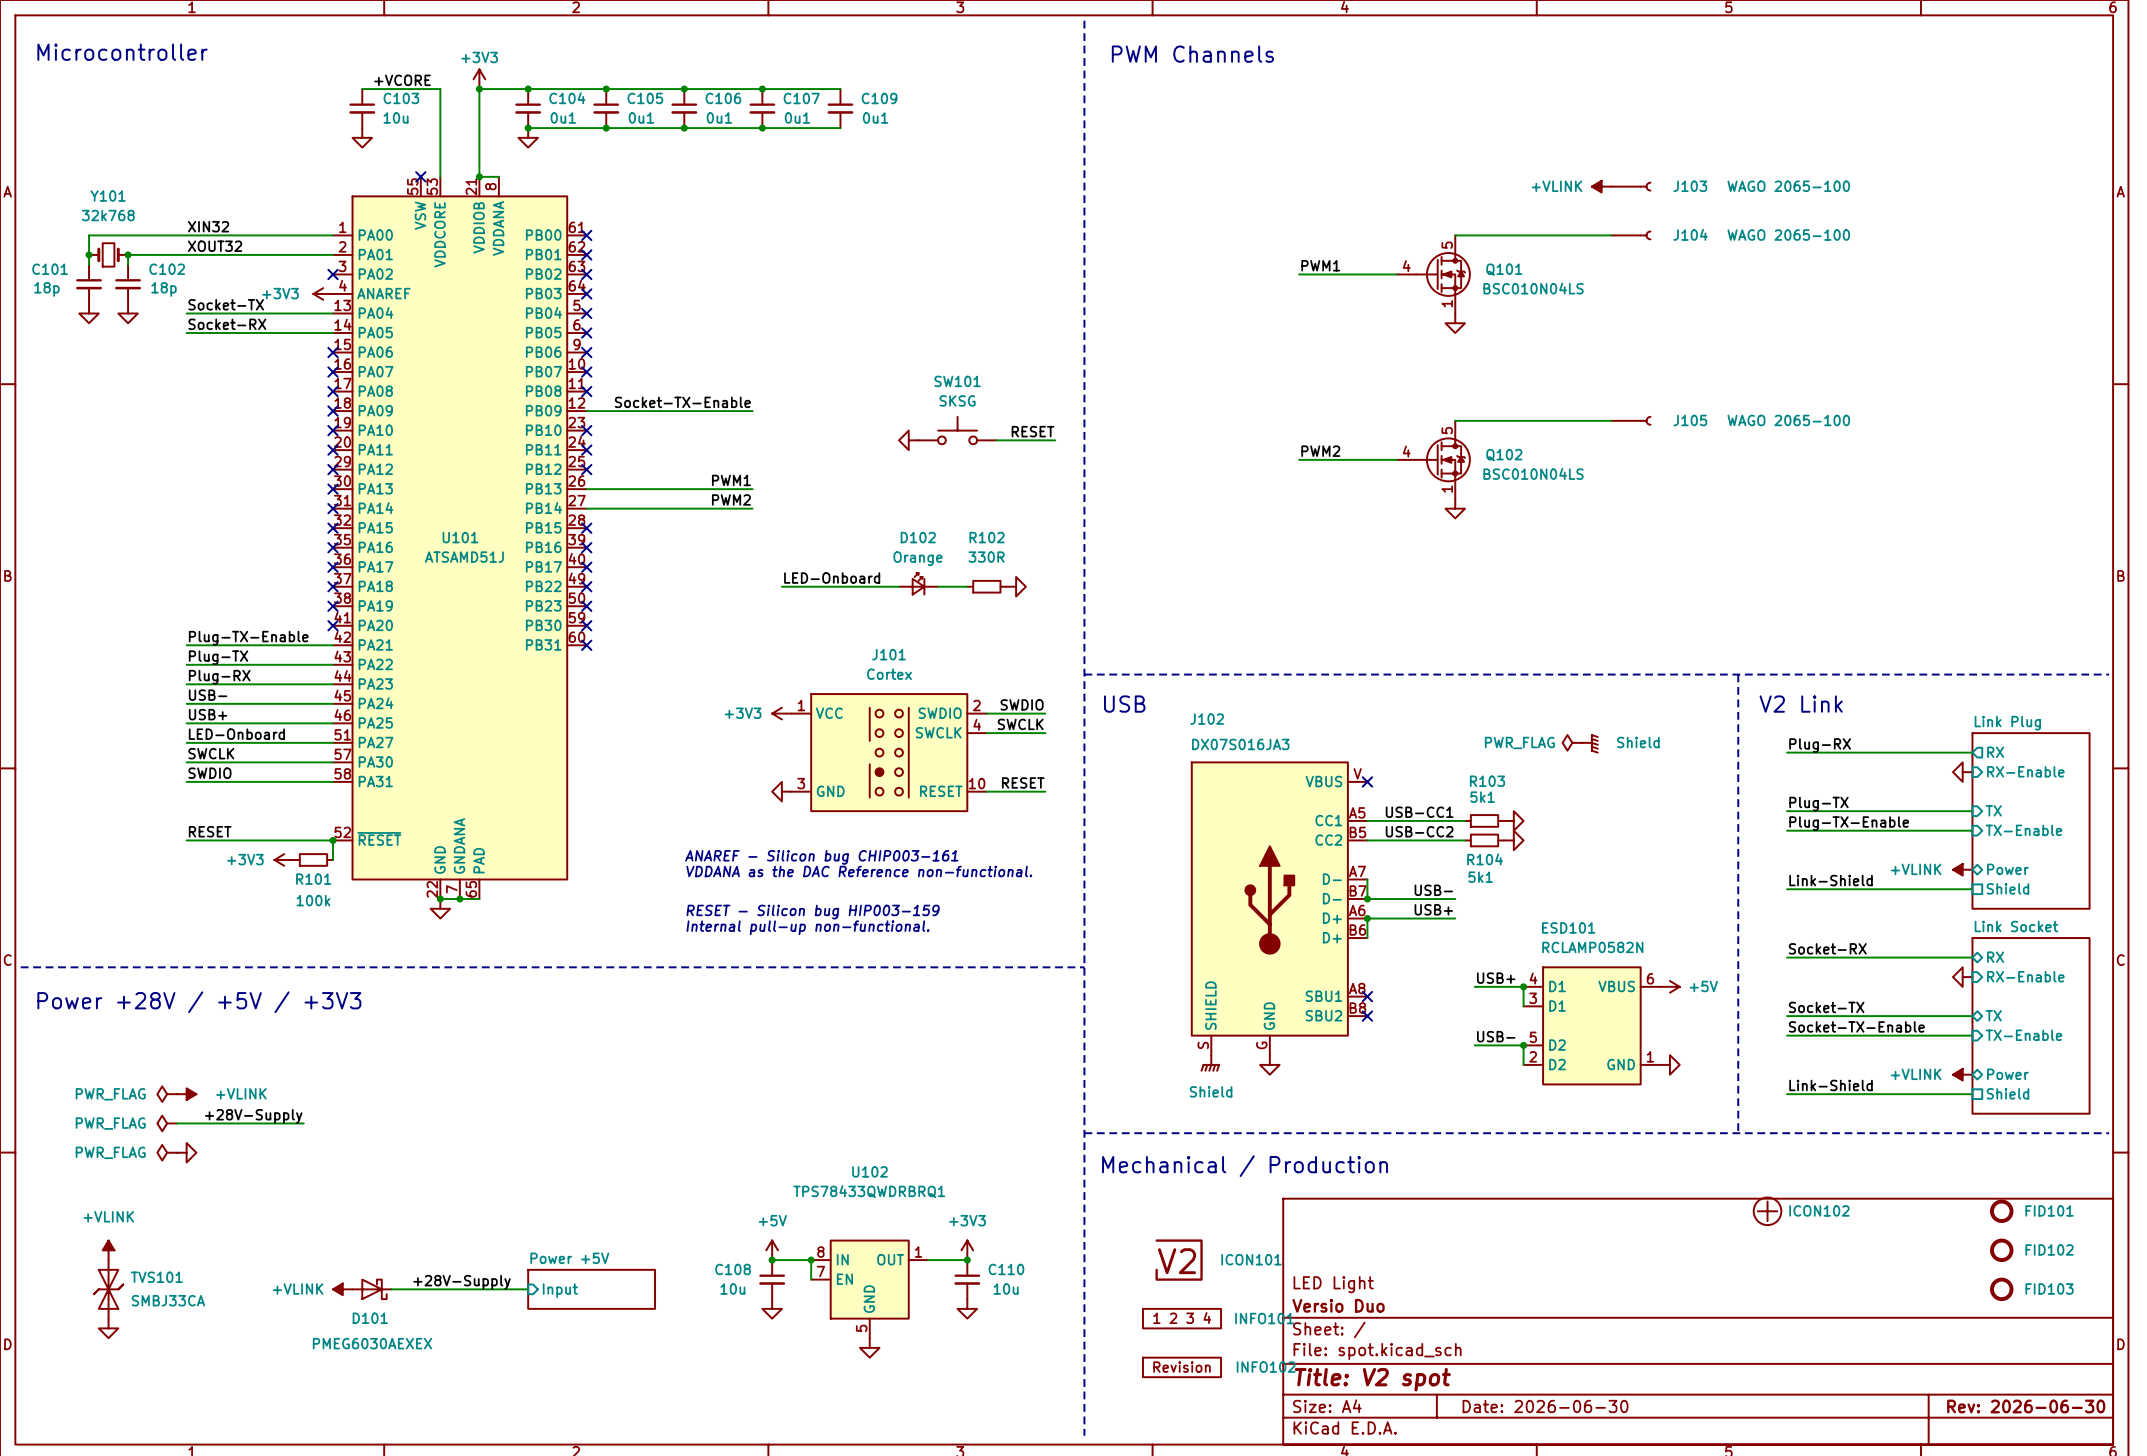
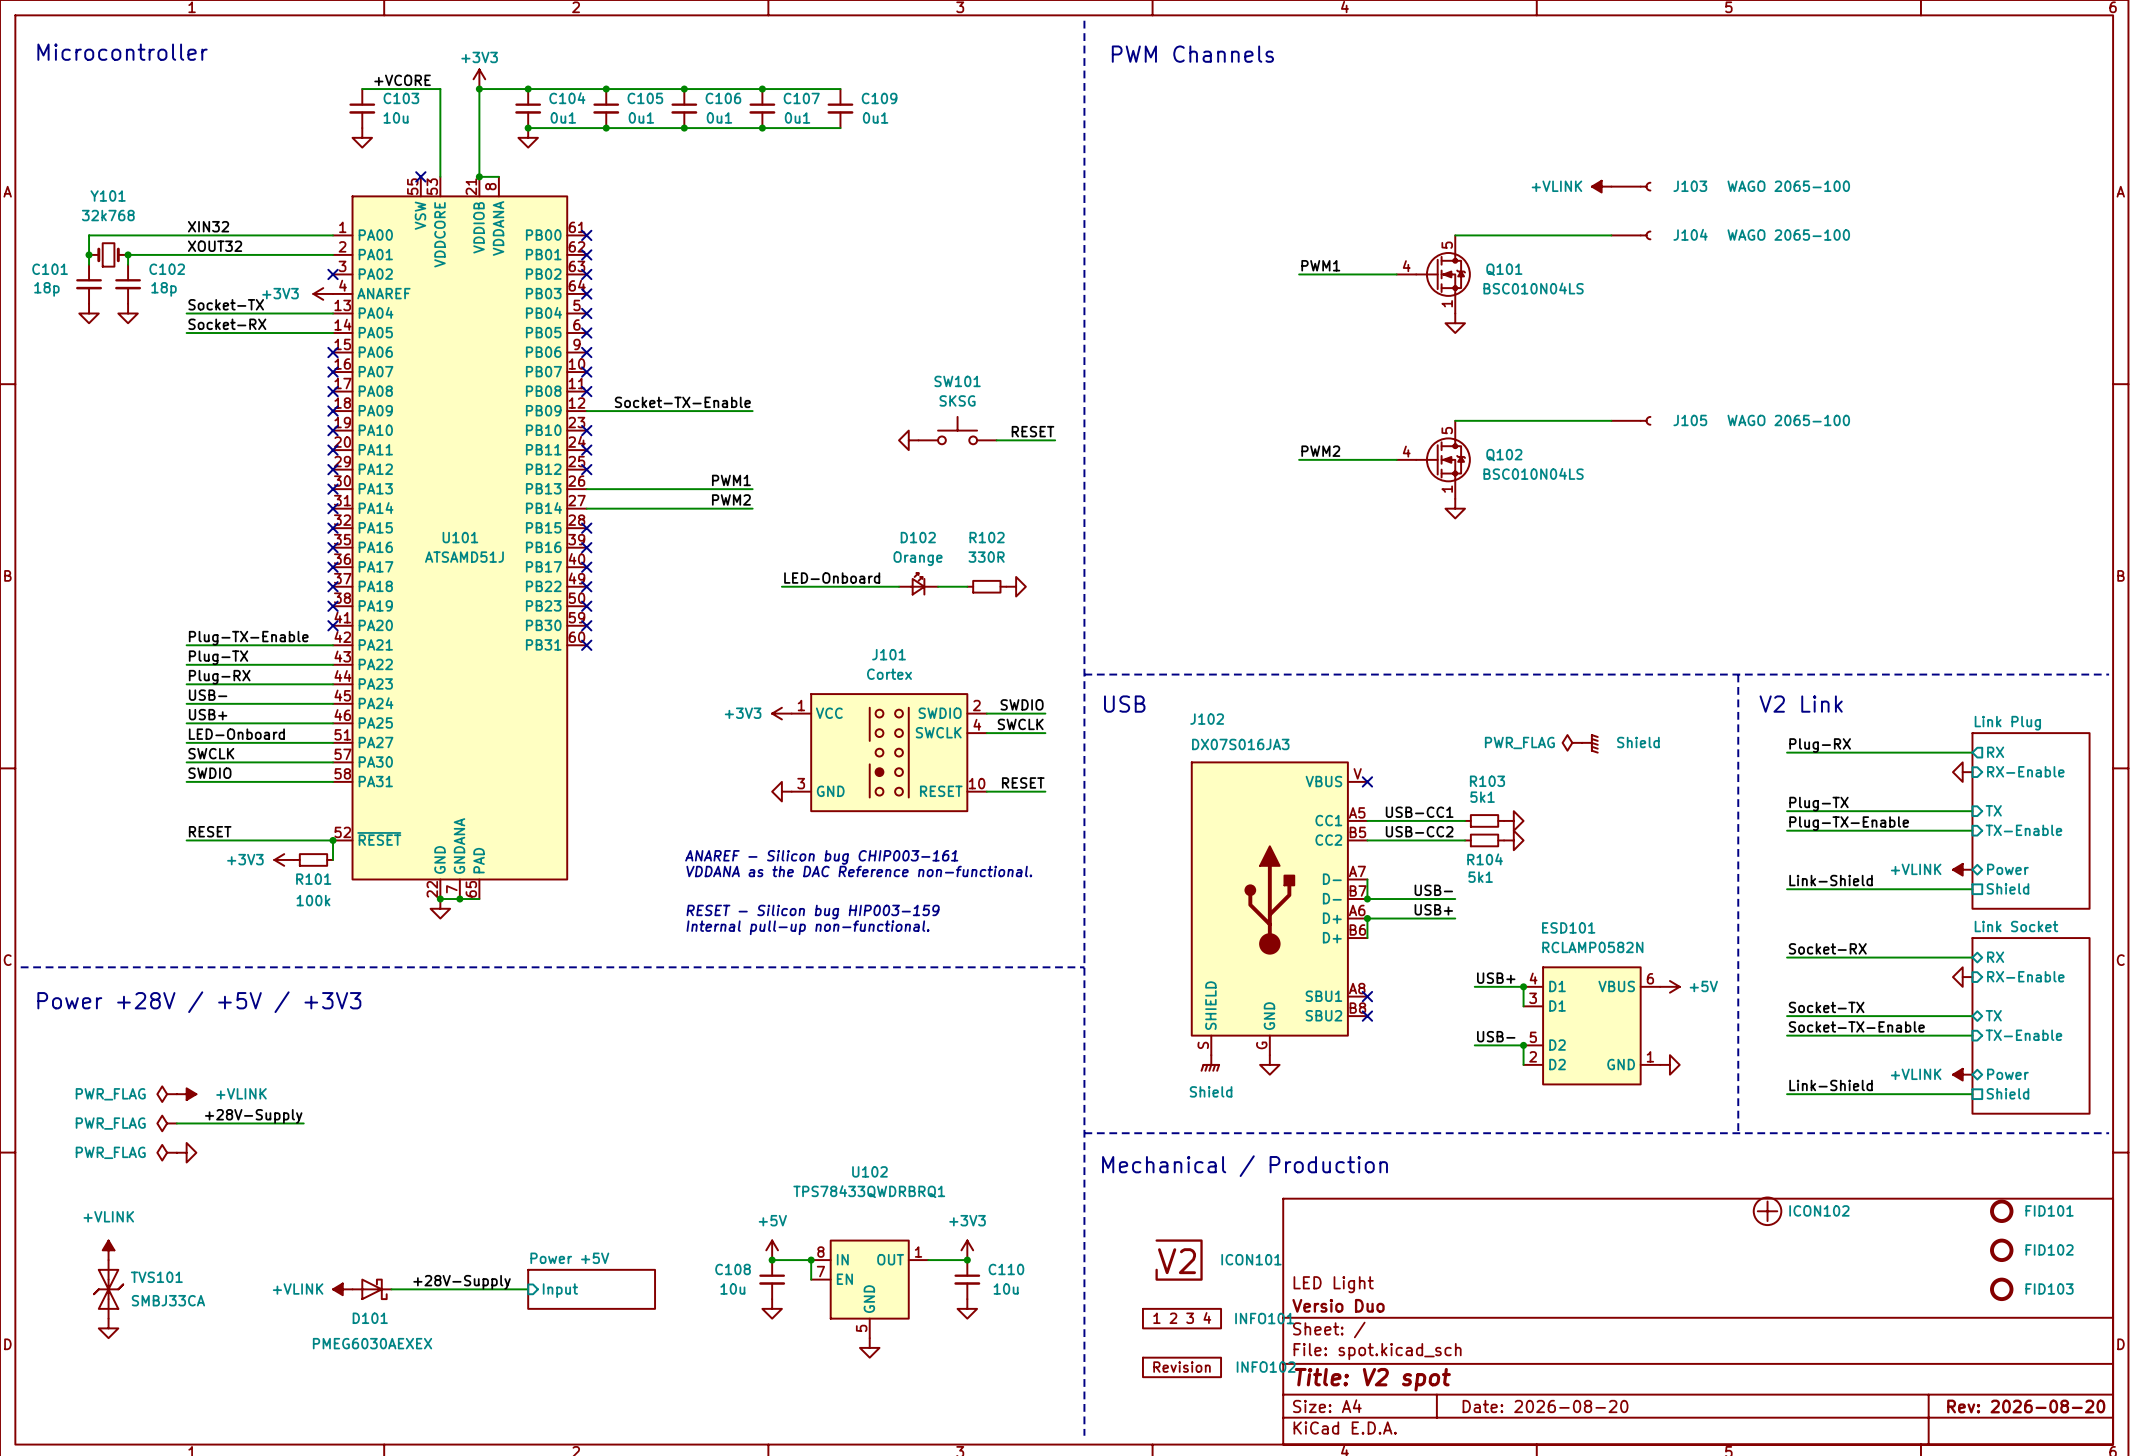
title block: Date: 2026-06-30 (1545, 1406) -> Date: 2026-08-20 (1545, 1406)
title block: Rev: 2026-06-30 (2026, 1406) -> Rev: 2026-08-20 (2026, 1406)

